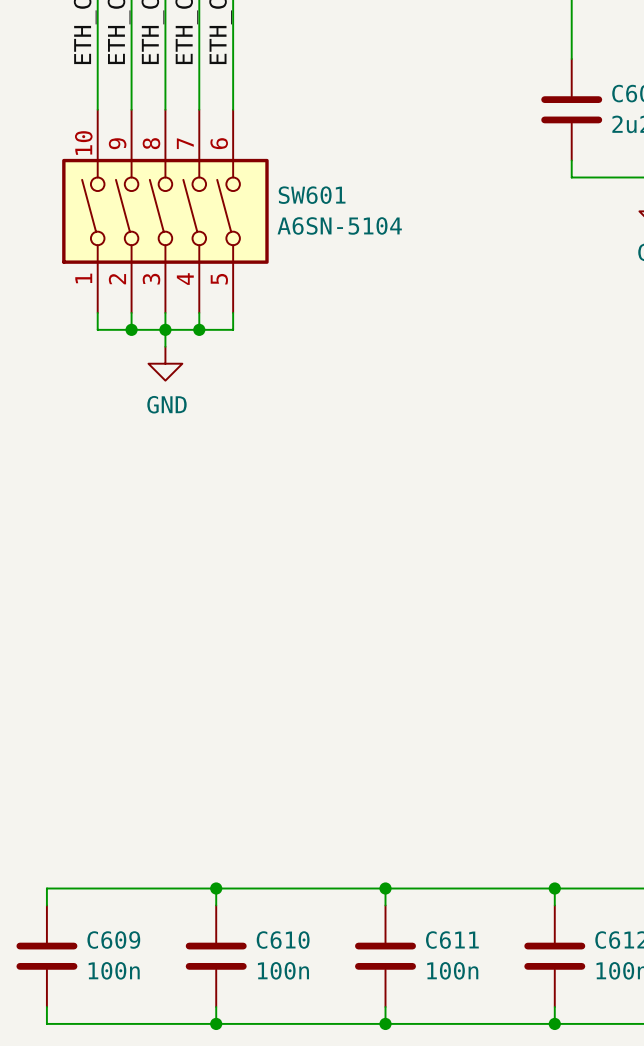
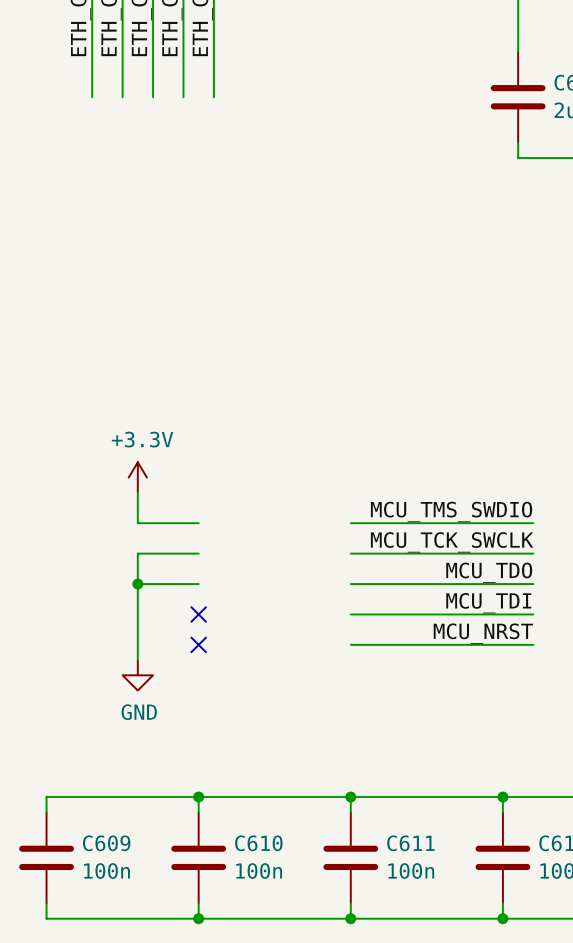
SW601: A6SN-5104 (165, 211) -> none
wire: (97, 312) (97, 329) (233, 329) (233, 312) -> none
wire: (131, 312) (131, 329) -> none
wire: (165, 312) (165, 346) -> none
wire: (199, 312) (199, 329) -> none
junction: (131, 329) -> none
junction: (165, 329) -> none
junction: (199, 329) -> none
power symbol: GND (165, 363) -> none
power symbol: none -> +3.3V (137, 477)
wire: none -> (137, 492) (137, 523) (198, 523)
label: none -> MCU_TMS_SWDIO (451, 511)
wire: none -> (350, 523) (533, 523)
label: none -> MCU_TCK_SWCLK (452, 542)
wire: none -> (198, 553) (137, 553) (137, 660)
wire: none -> (350, 553) (533, 553)
label: none -> MCU_TDO (489, 572)
wire: none -> (137, 584) (198, 584)
junction: none -> (137, 584)
wire: none -> (350, 584) (533, 584)
label: none -> MCU_TDI (488, 603)
no-connect mark: none -> (198, 614)
wire: none -> (350, 614) (533, 614)
label: none -> MCU_NRST (483, 633)
no-connect mark: none -> (198, 644)
wire: none -> (350, 644) (533, 644)
power symbol: none -> GND (137, 675)

